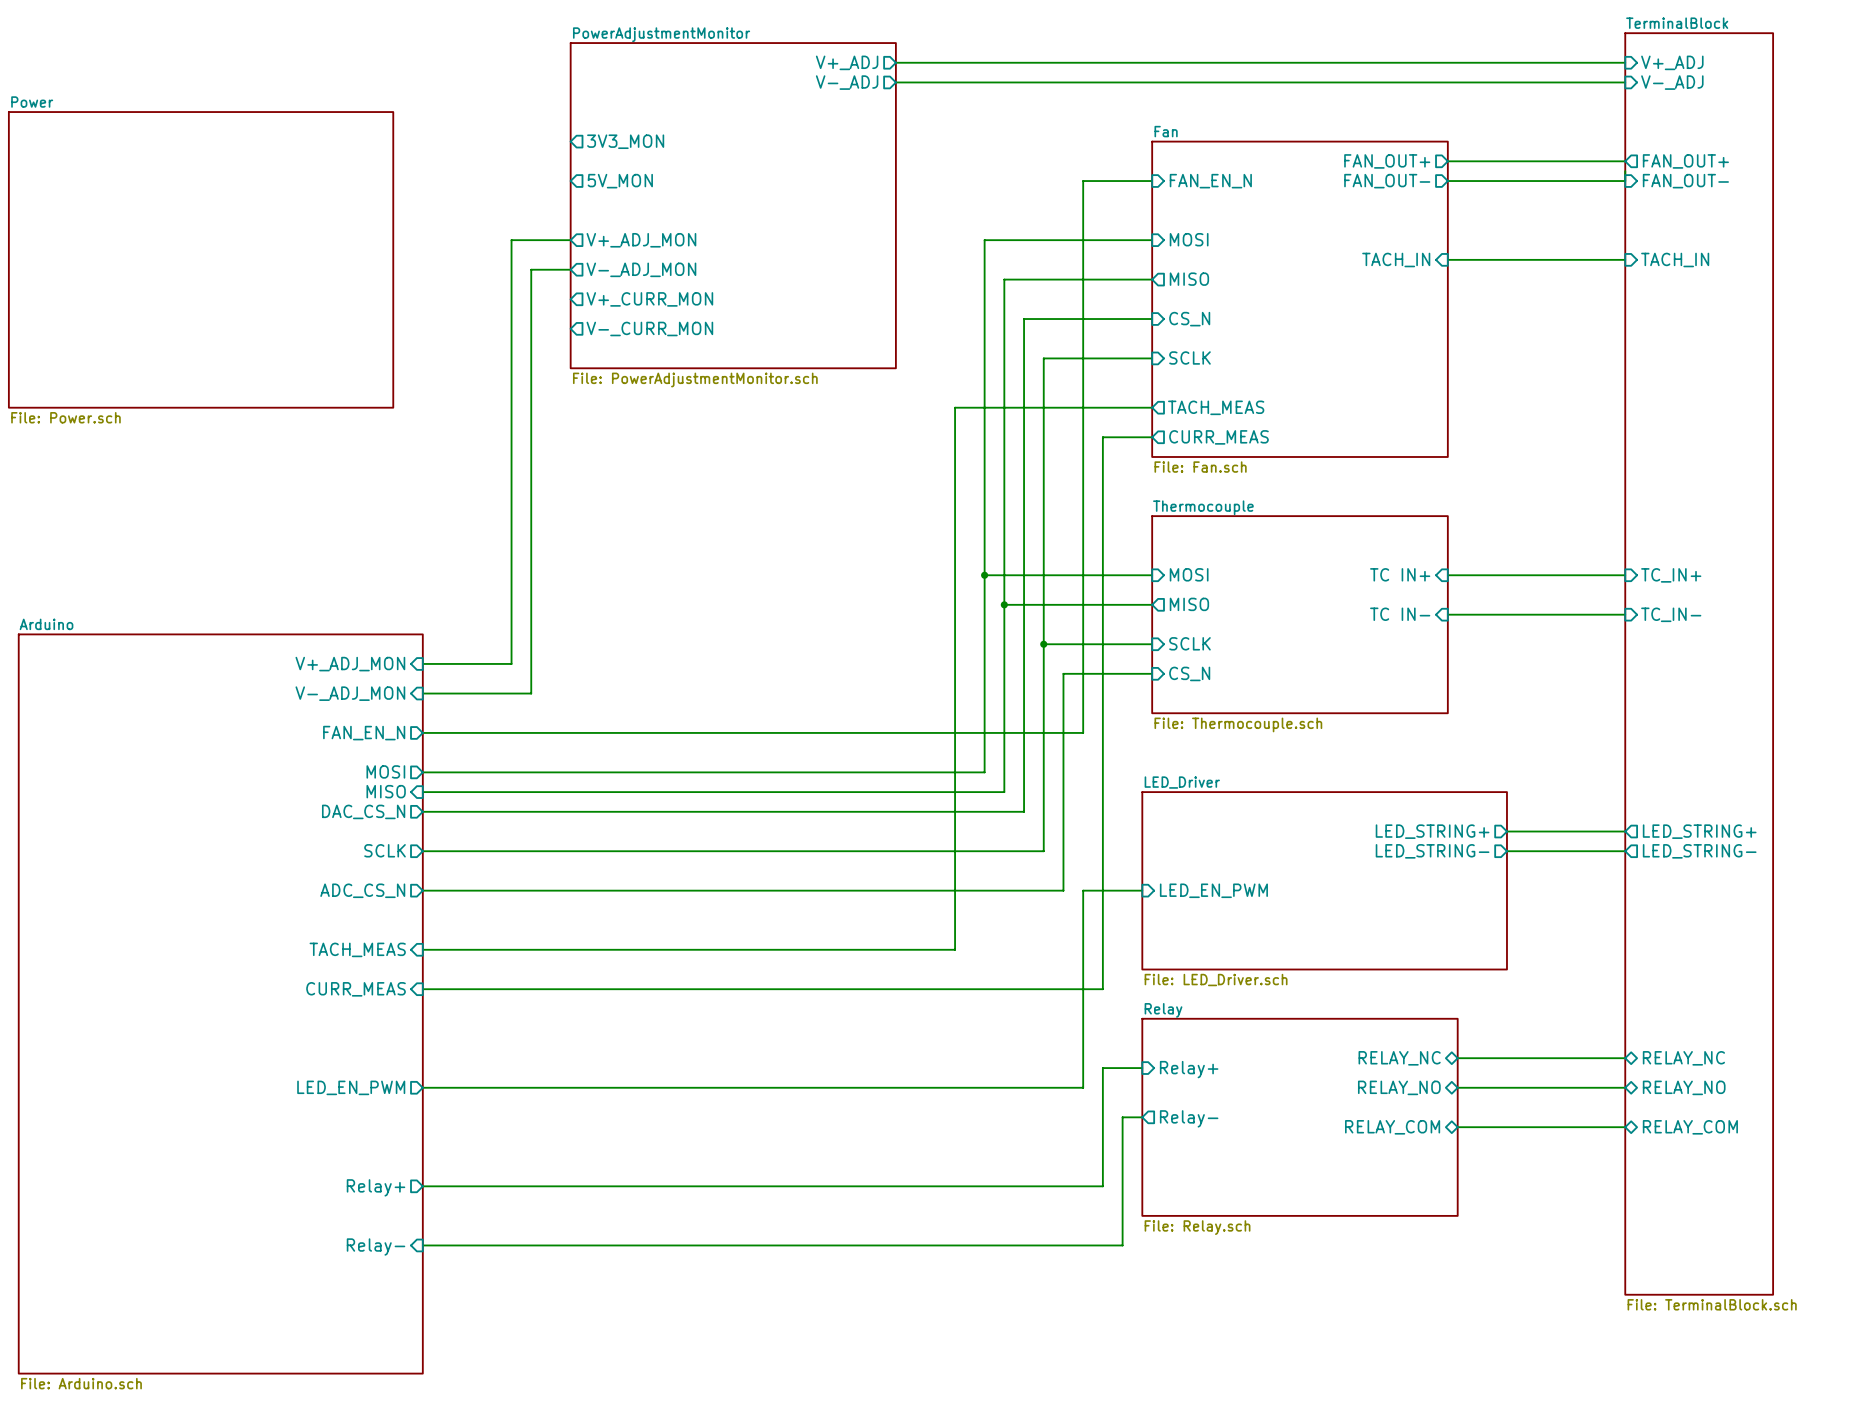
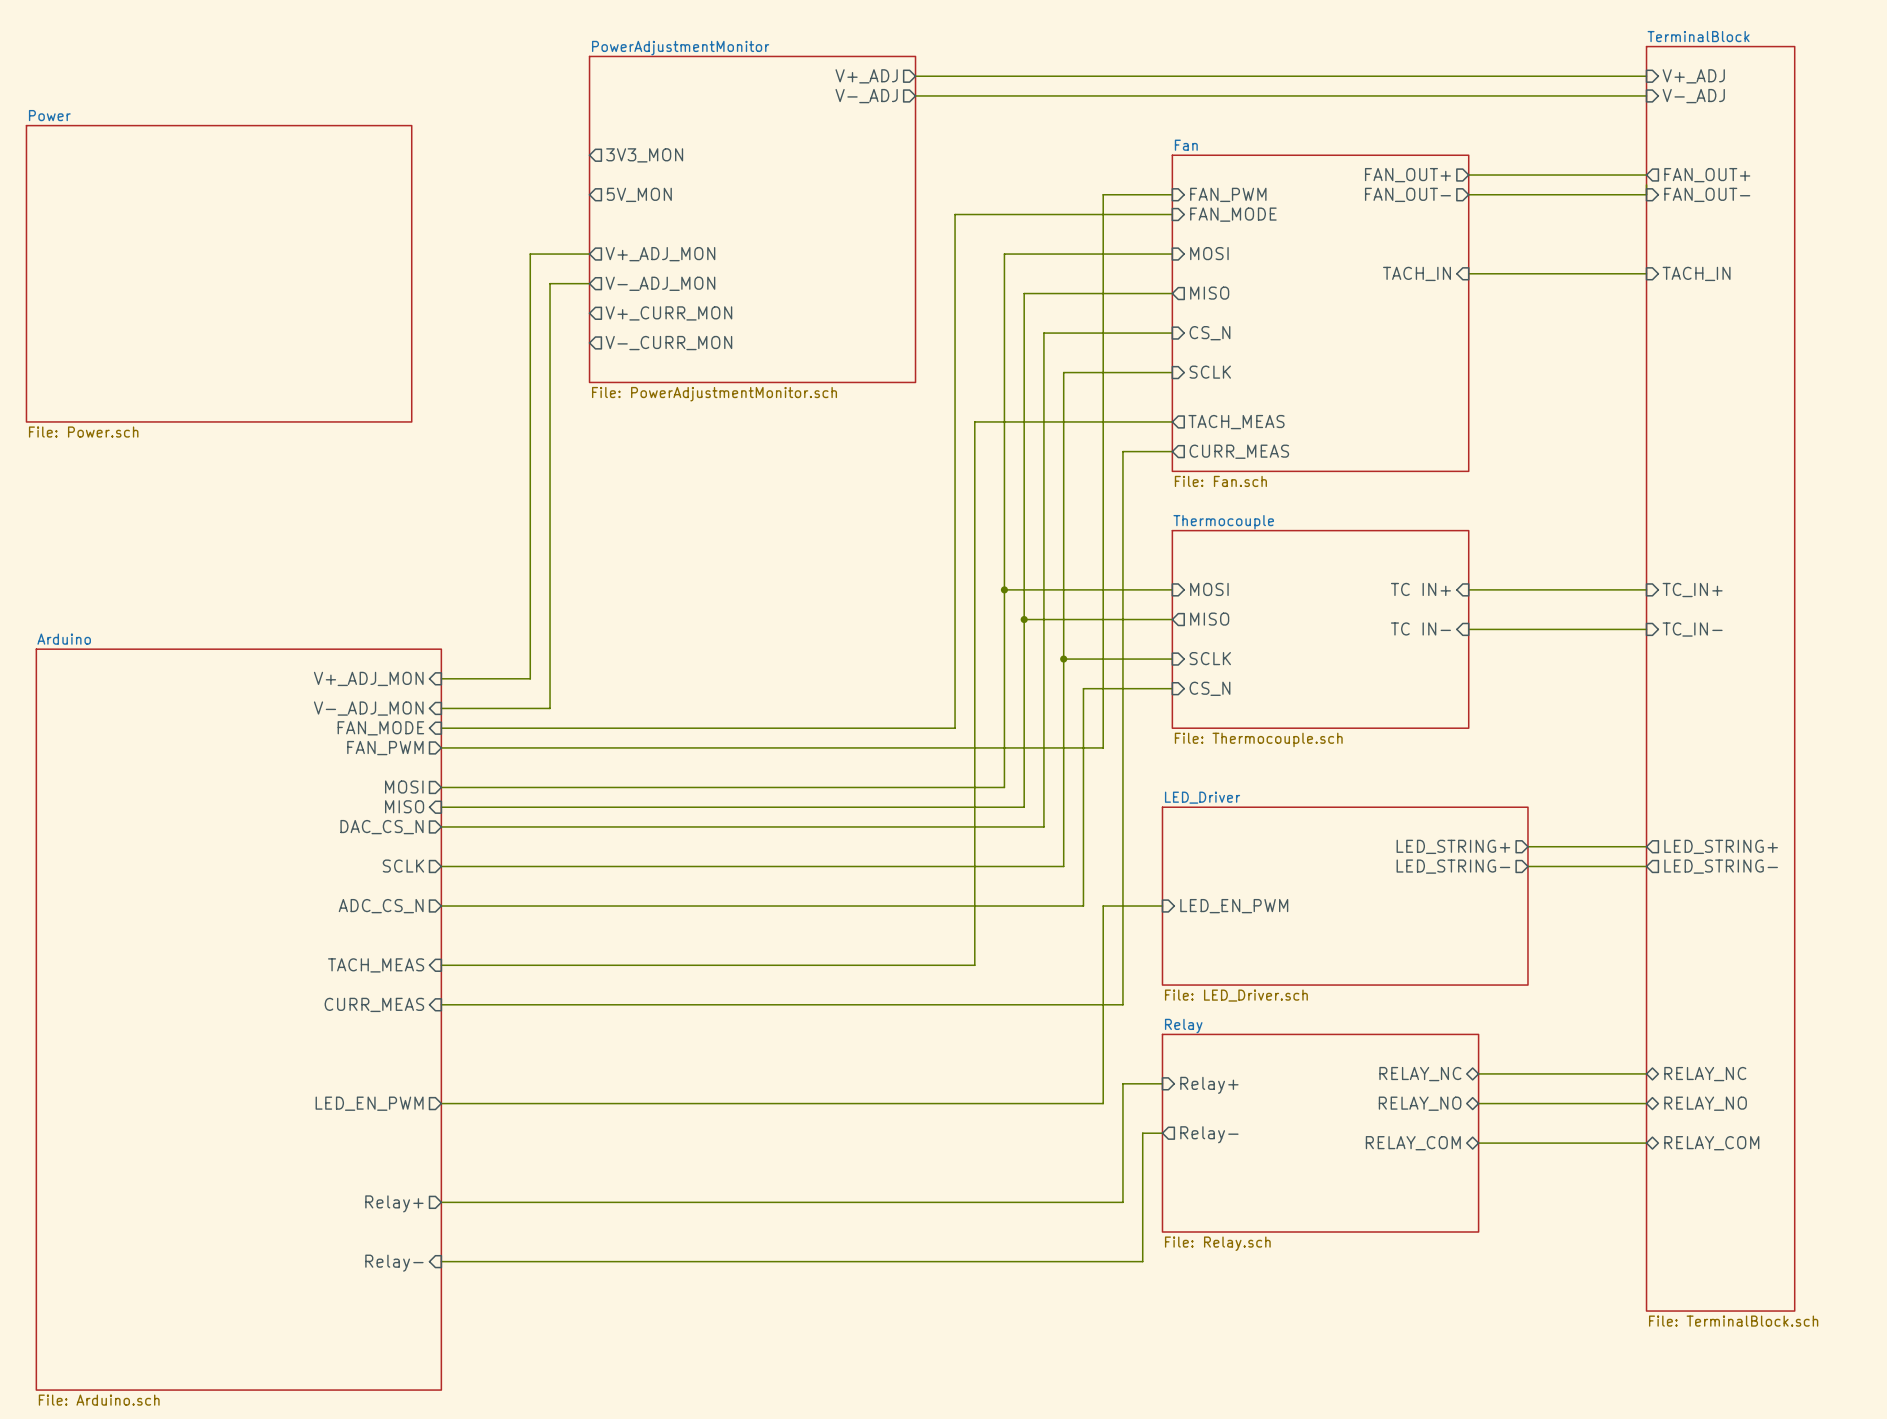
sheet pin: FAN_EN_N (1210, 181) -> FAN_PWM (1228, 194)
wire: none -> (1172, 214) (955, 214) (955, 728) (441, 728)
sheet pin: none -> FAN_MODE (1233, 214)
sheet pin: none -> FAN_MODE (380, 728)
sheet pin: FAN_EN_N (364, 733) -> FAN_PWM (385, 748)

